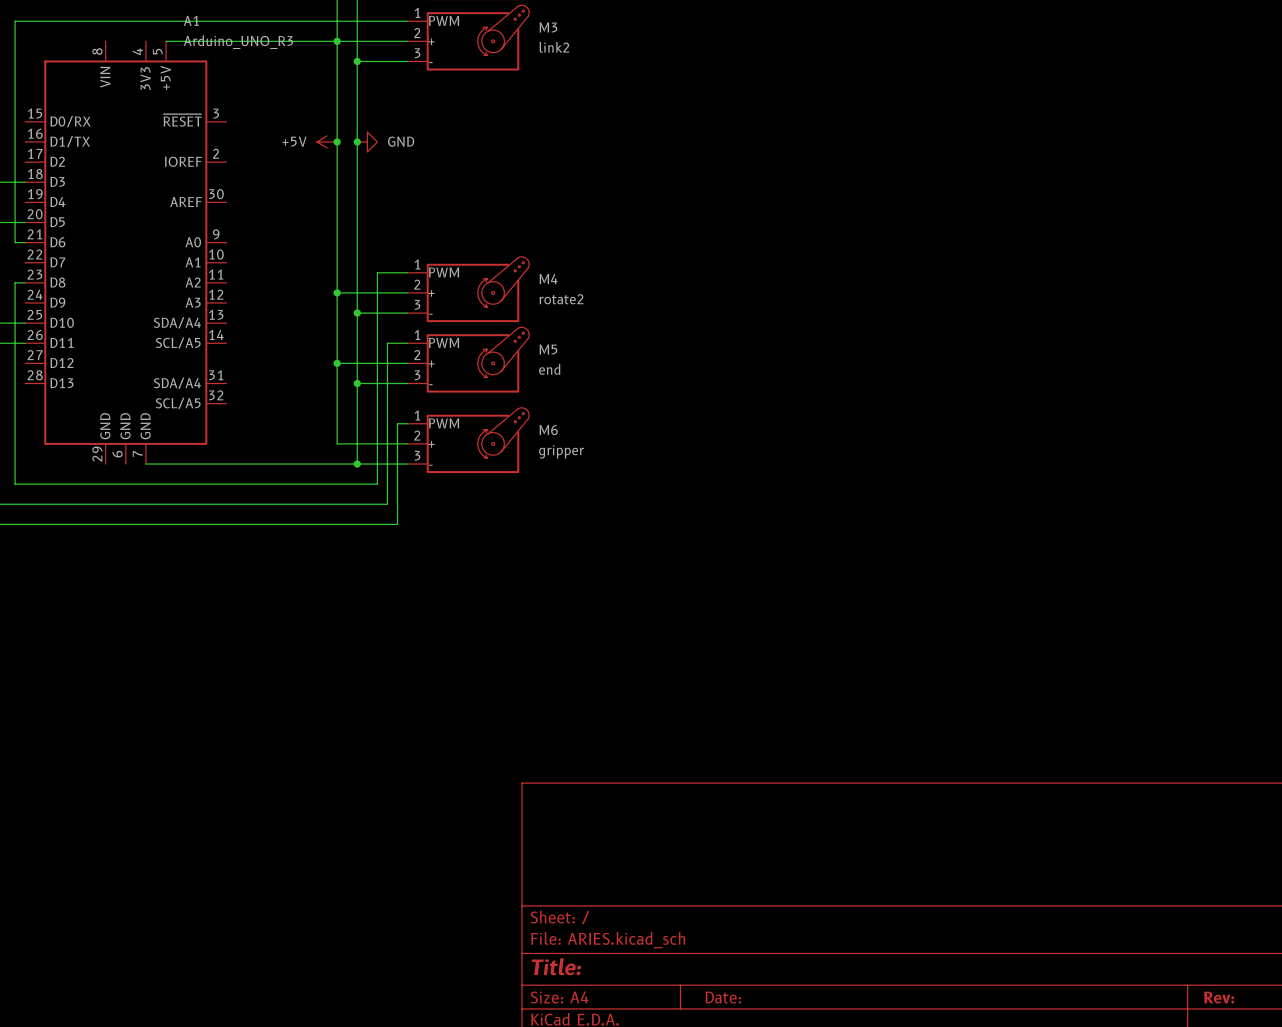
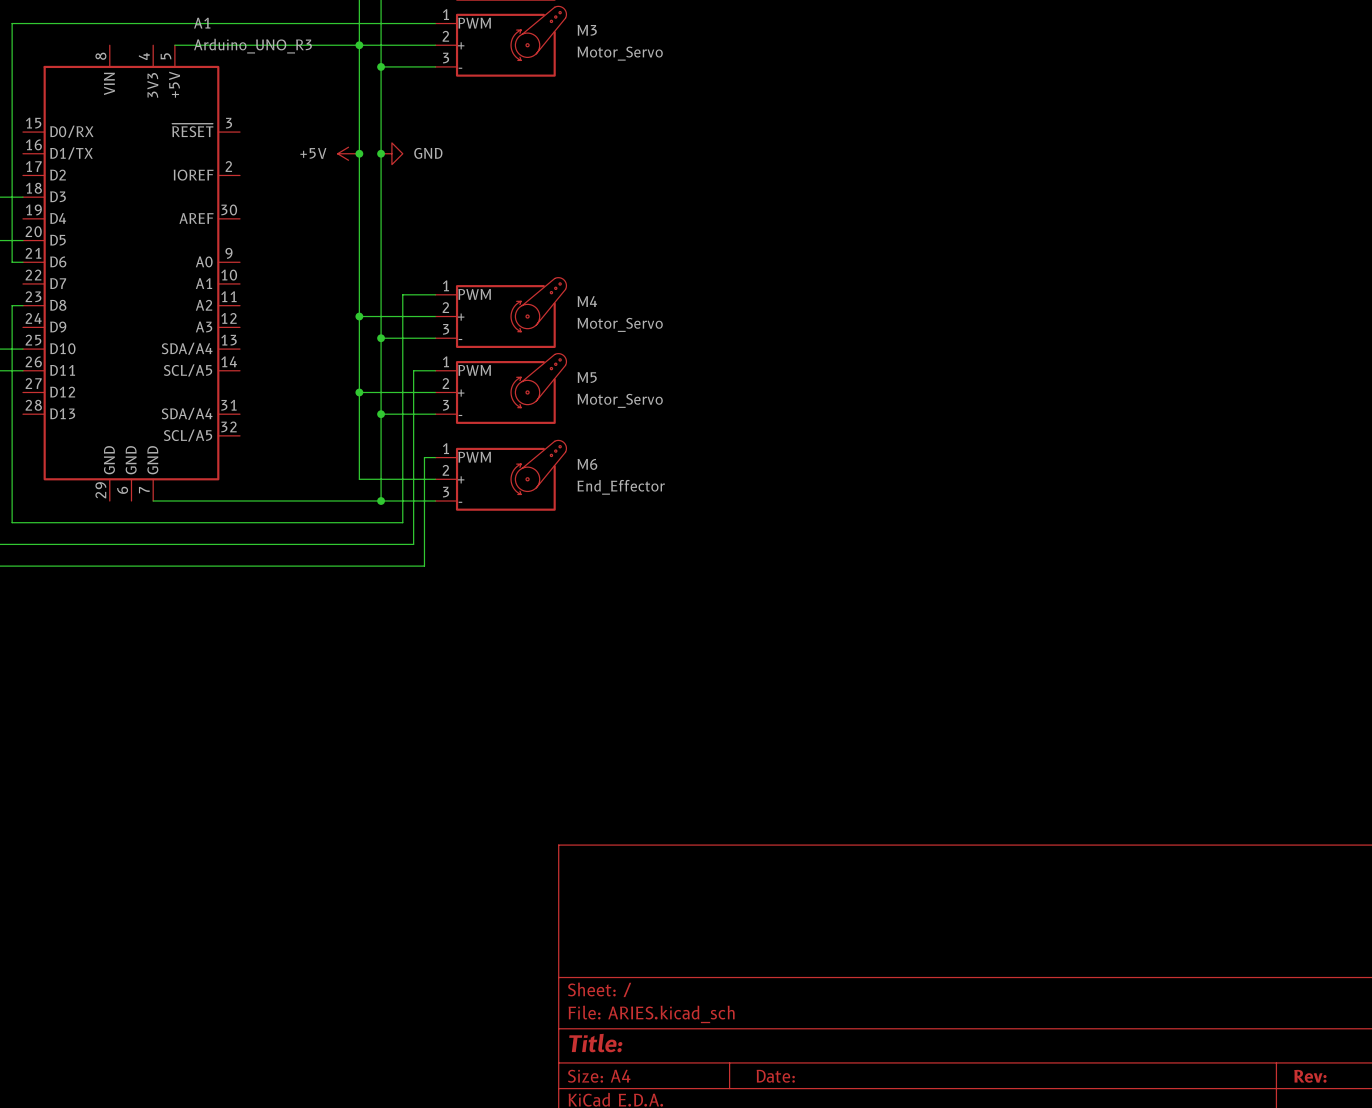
M3 value: link2 (554, 47) -> Motor_Servo (620, 53)
M4 value: rotate2 (561, 299) -> Motor_Servo (620, 324)
M5 value: end (549, 369) -> Motor_Servo (620, 400)
M6 value: gripper (561, 451) -> End_Effector (621, 487)

